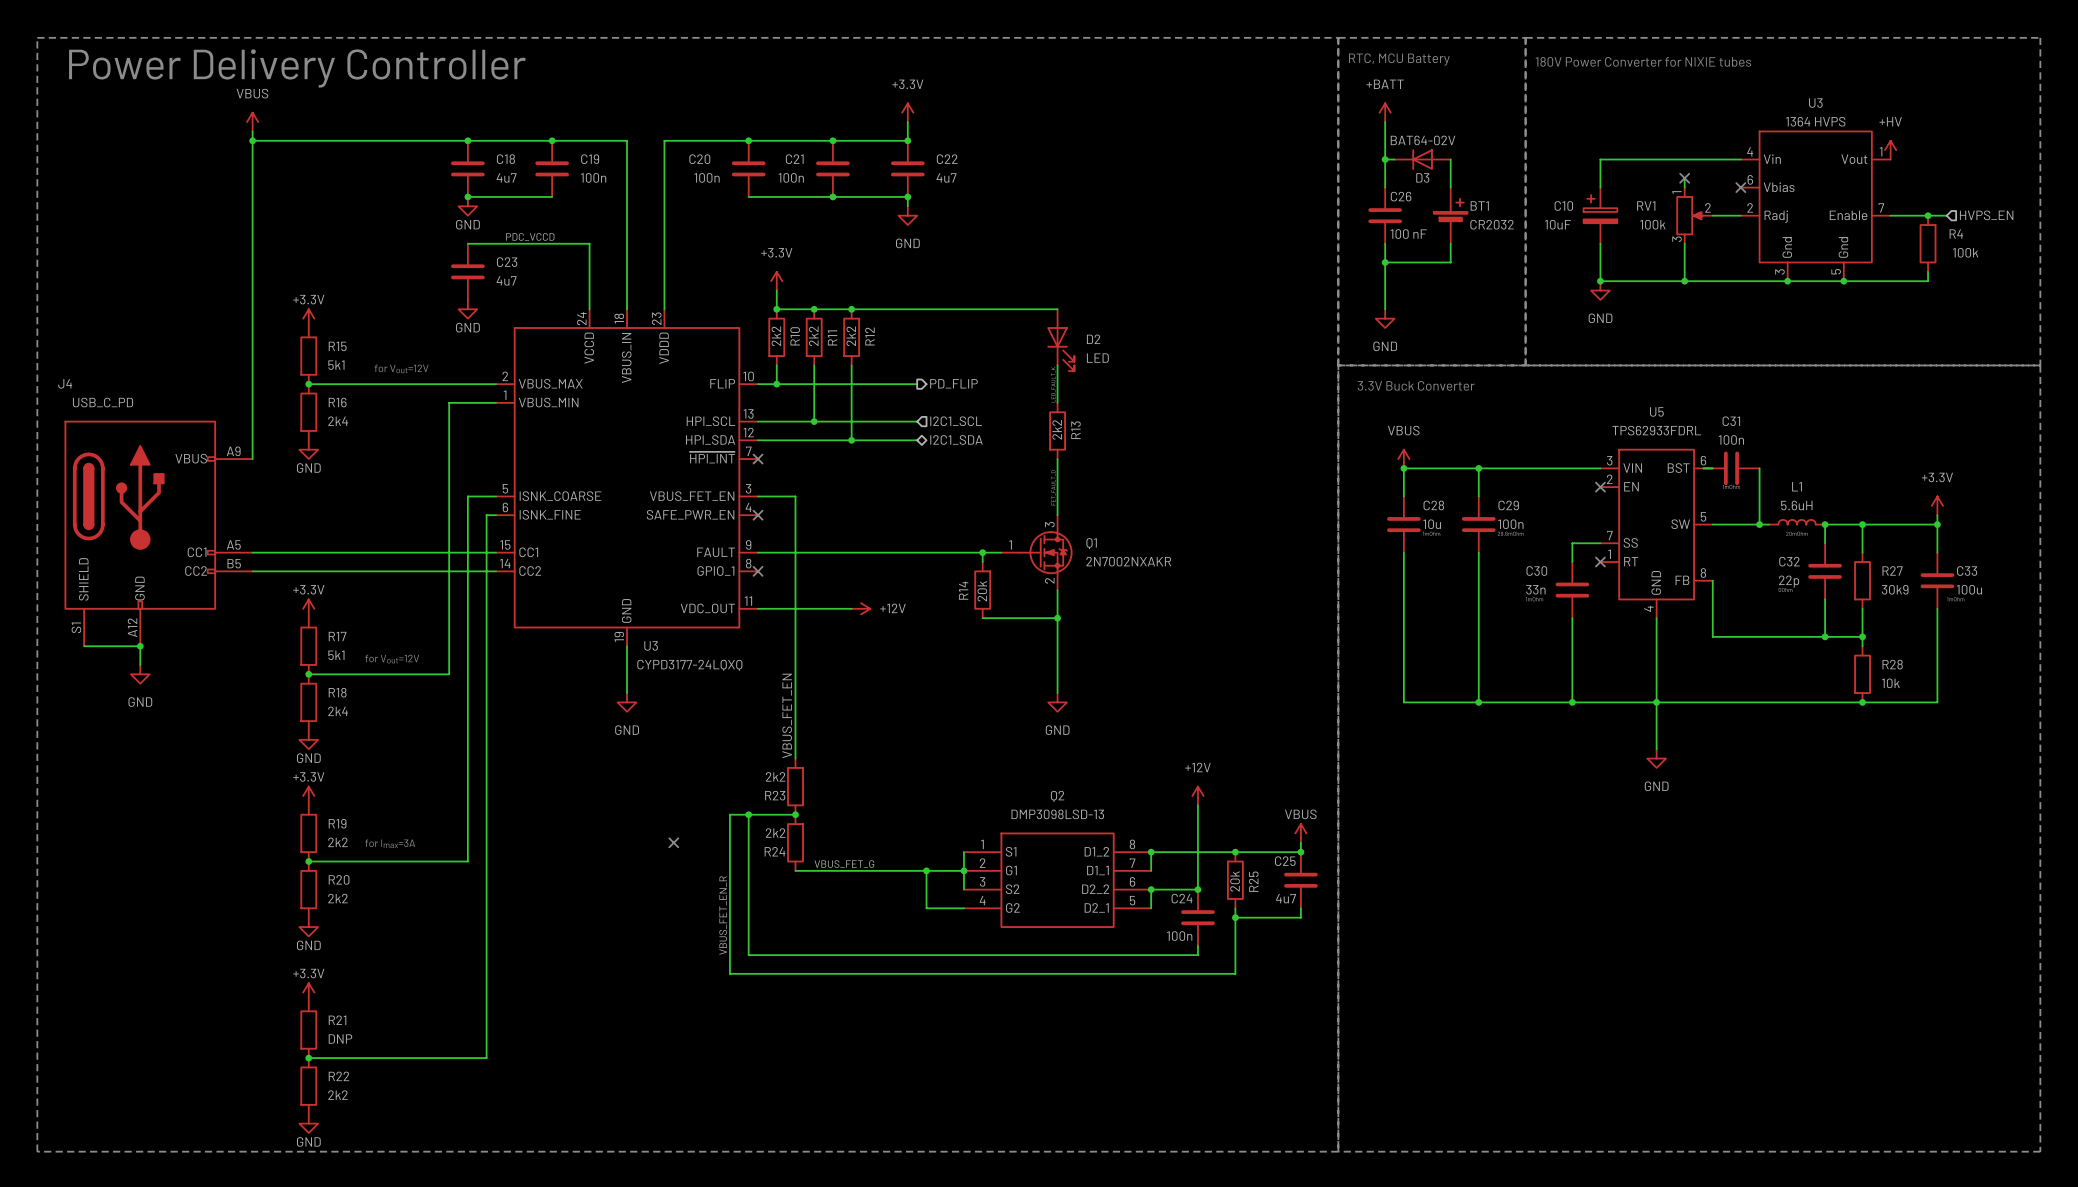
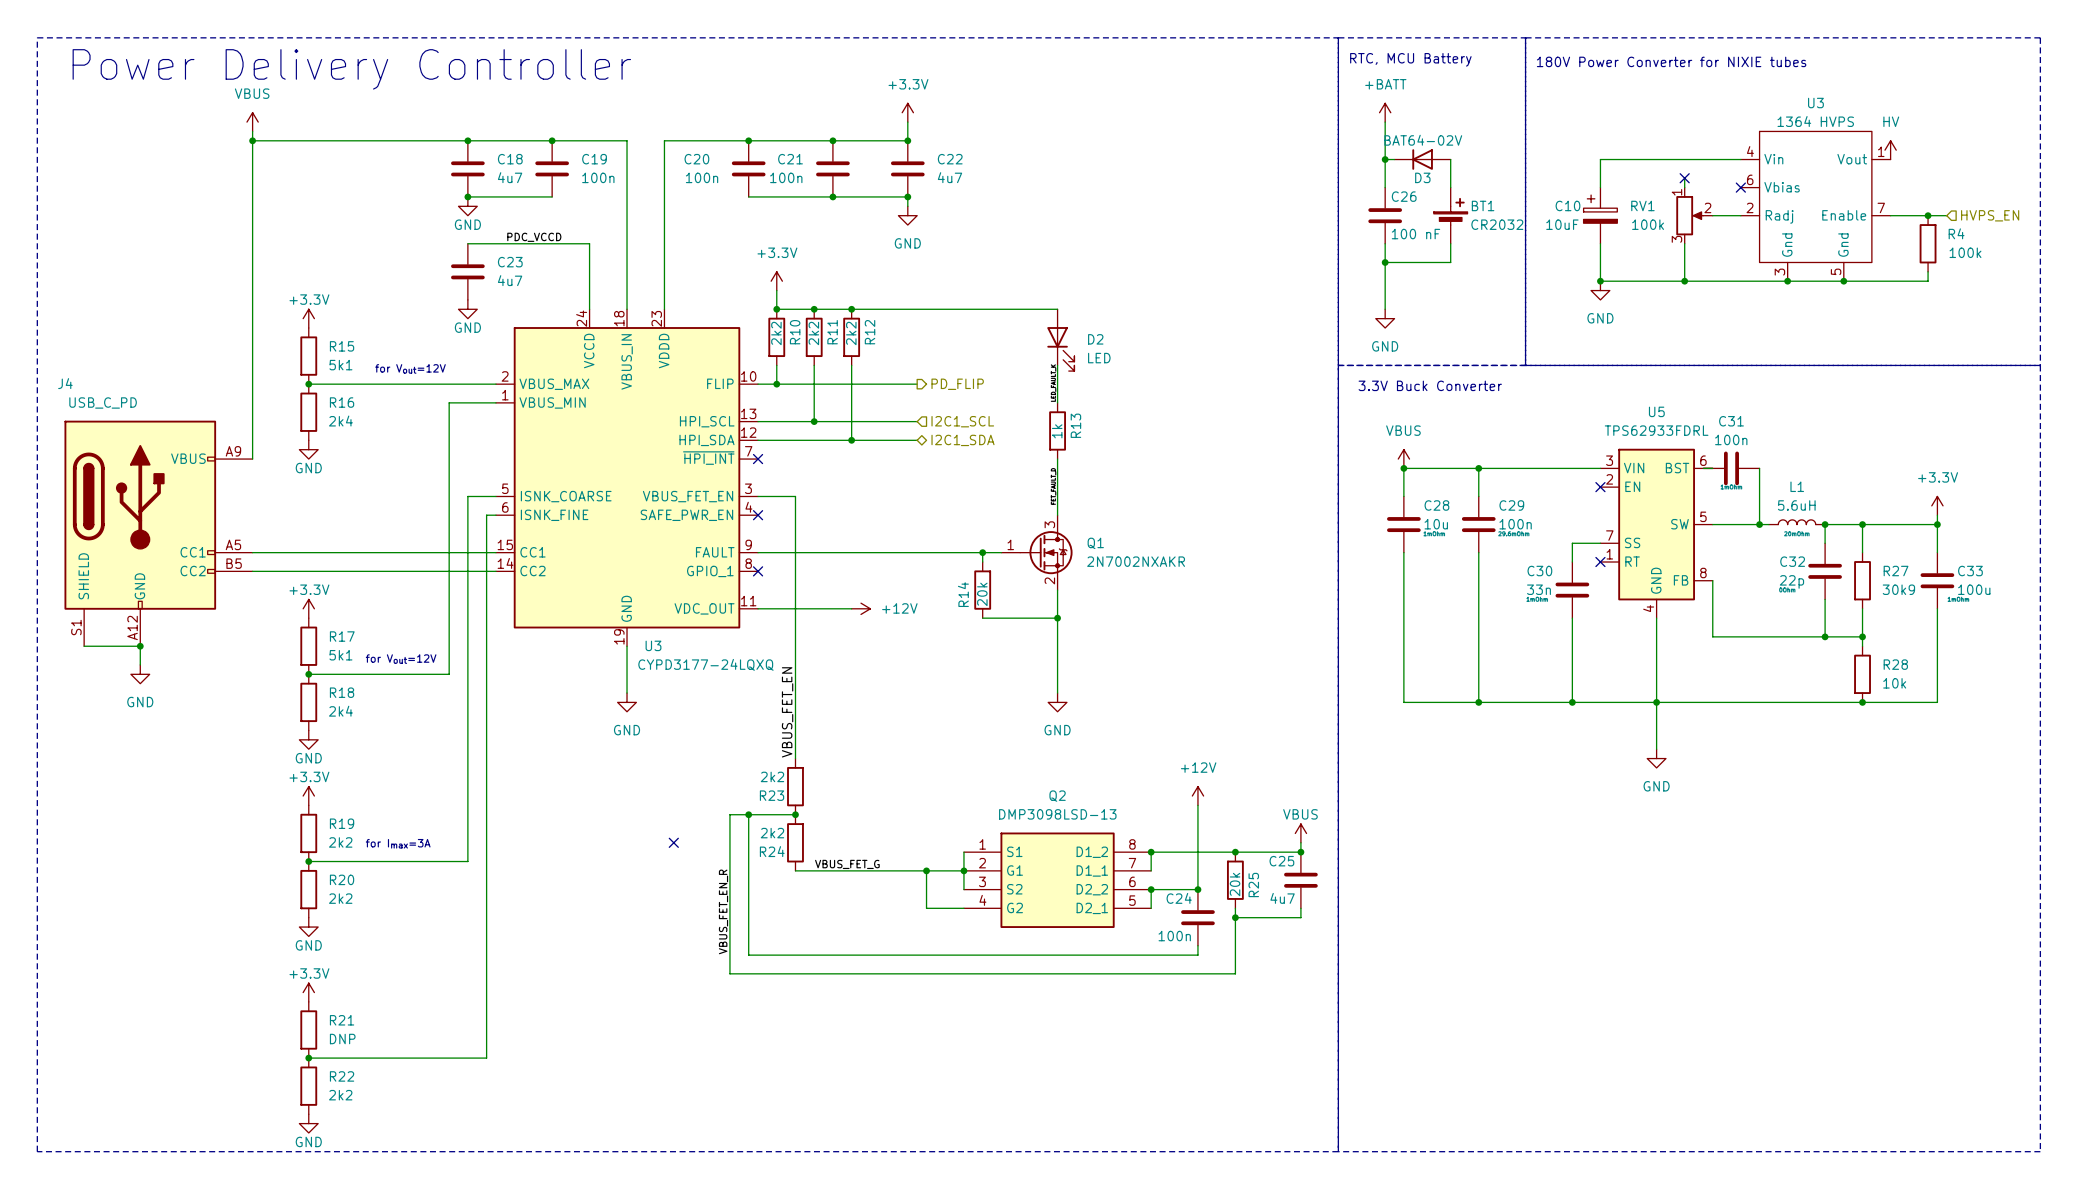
power symbol: +HV (1890, 150) -> HV (1890, 150)
R13 value: 2k2 (1057, 429) -> 1k (1057, 431)

